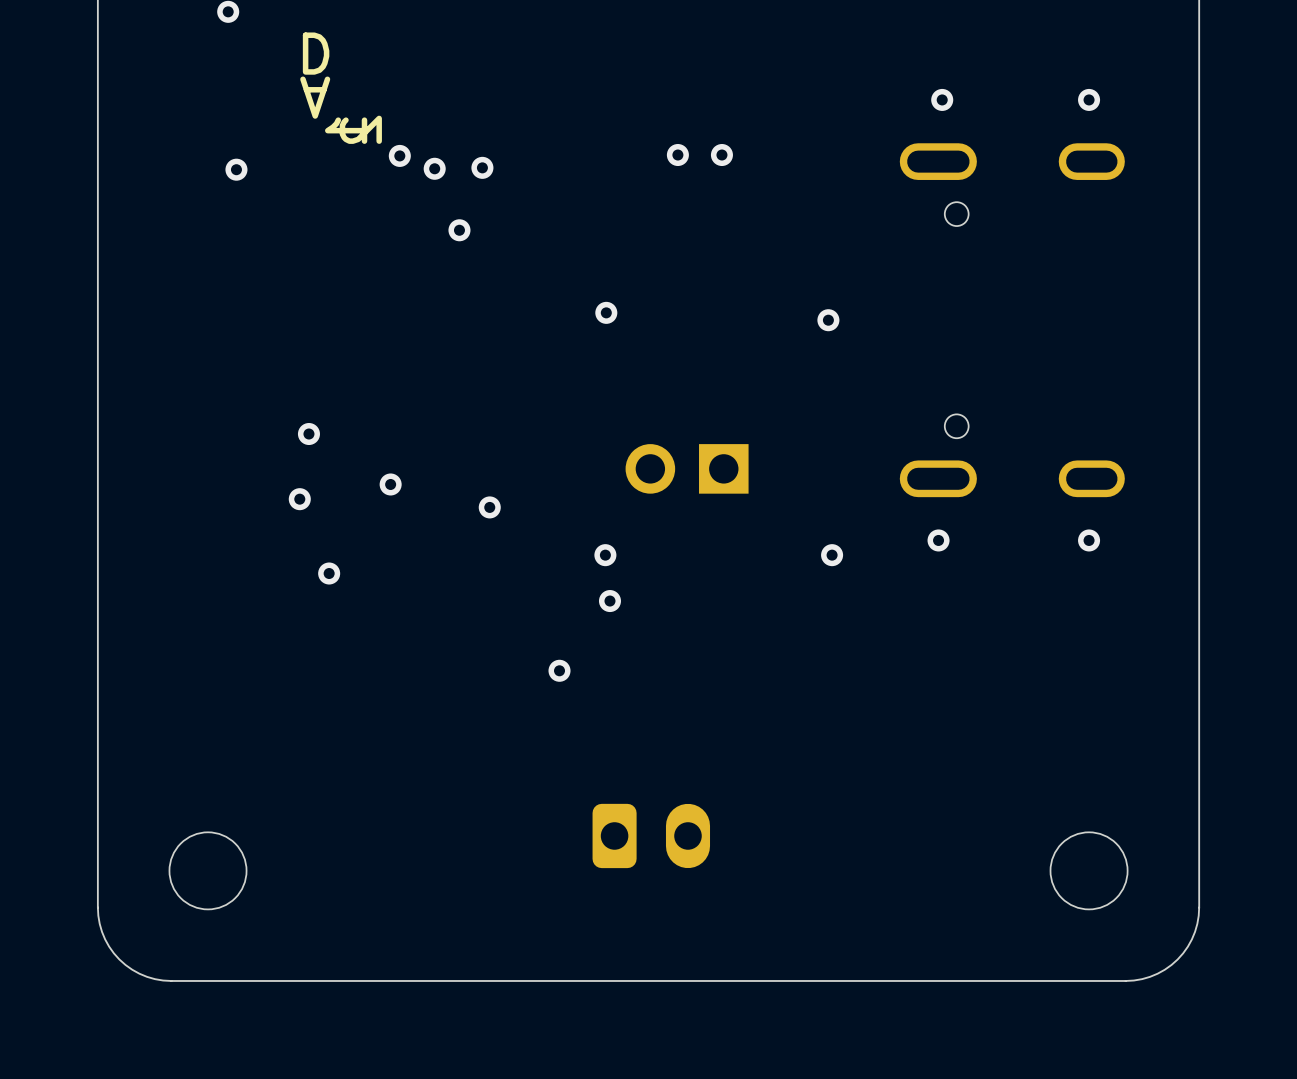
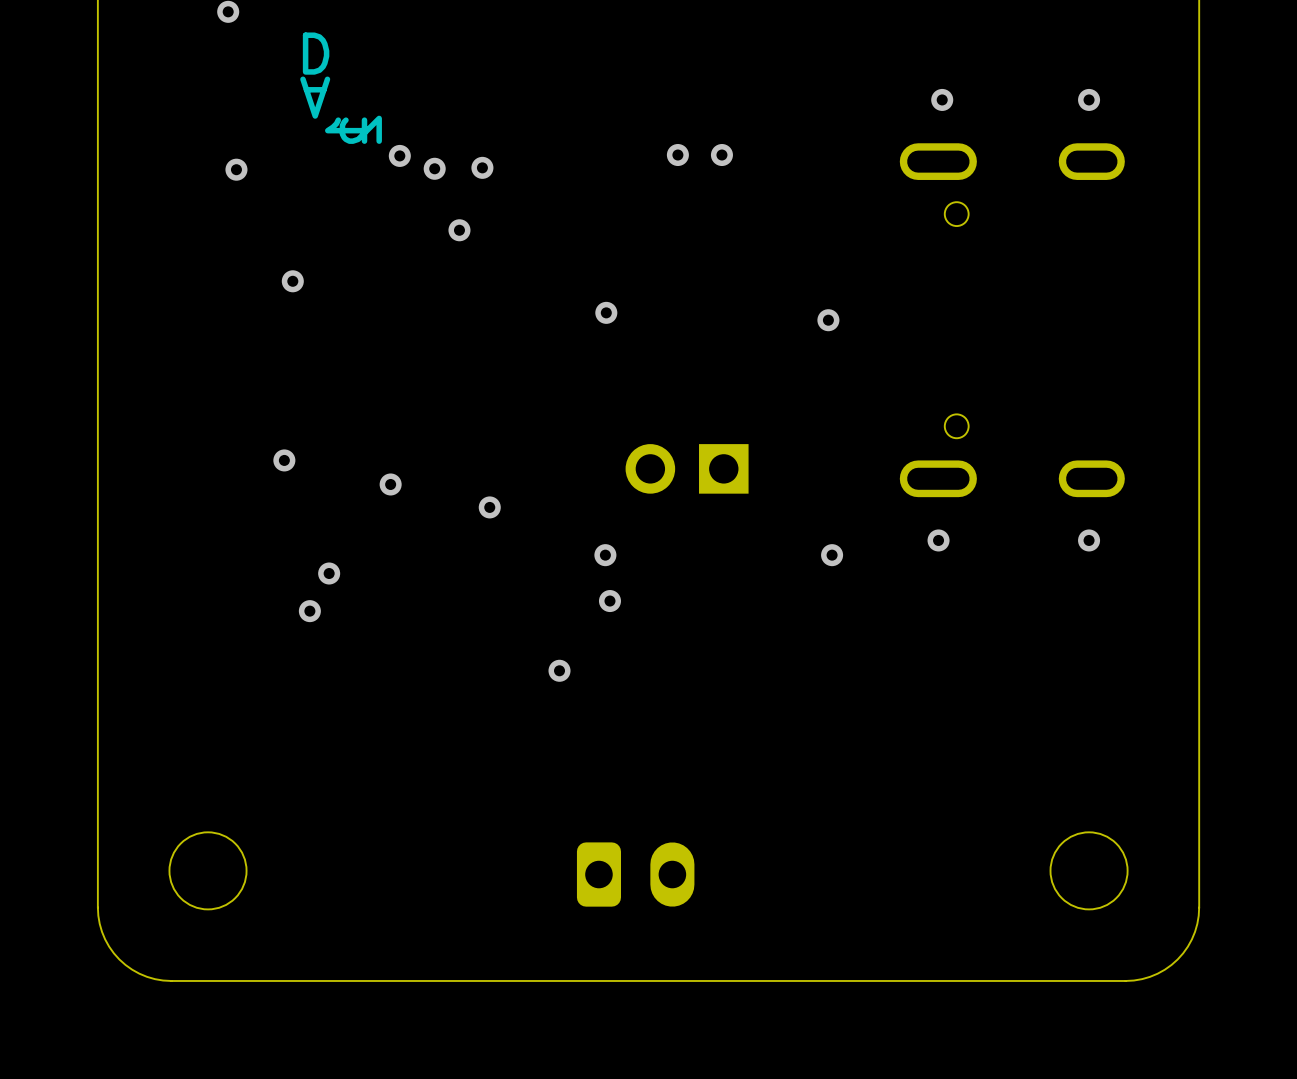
via: none -> (292, 281)
via: (308, 434) -> none
via: none -> (284, 460)
via: (299, 499) -> none
via: none -> (309, 611)
part position: (651, 835) -> (635, 874)

